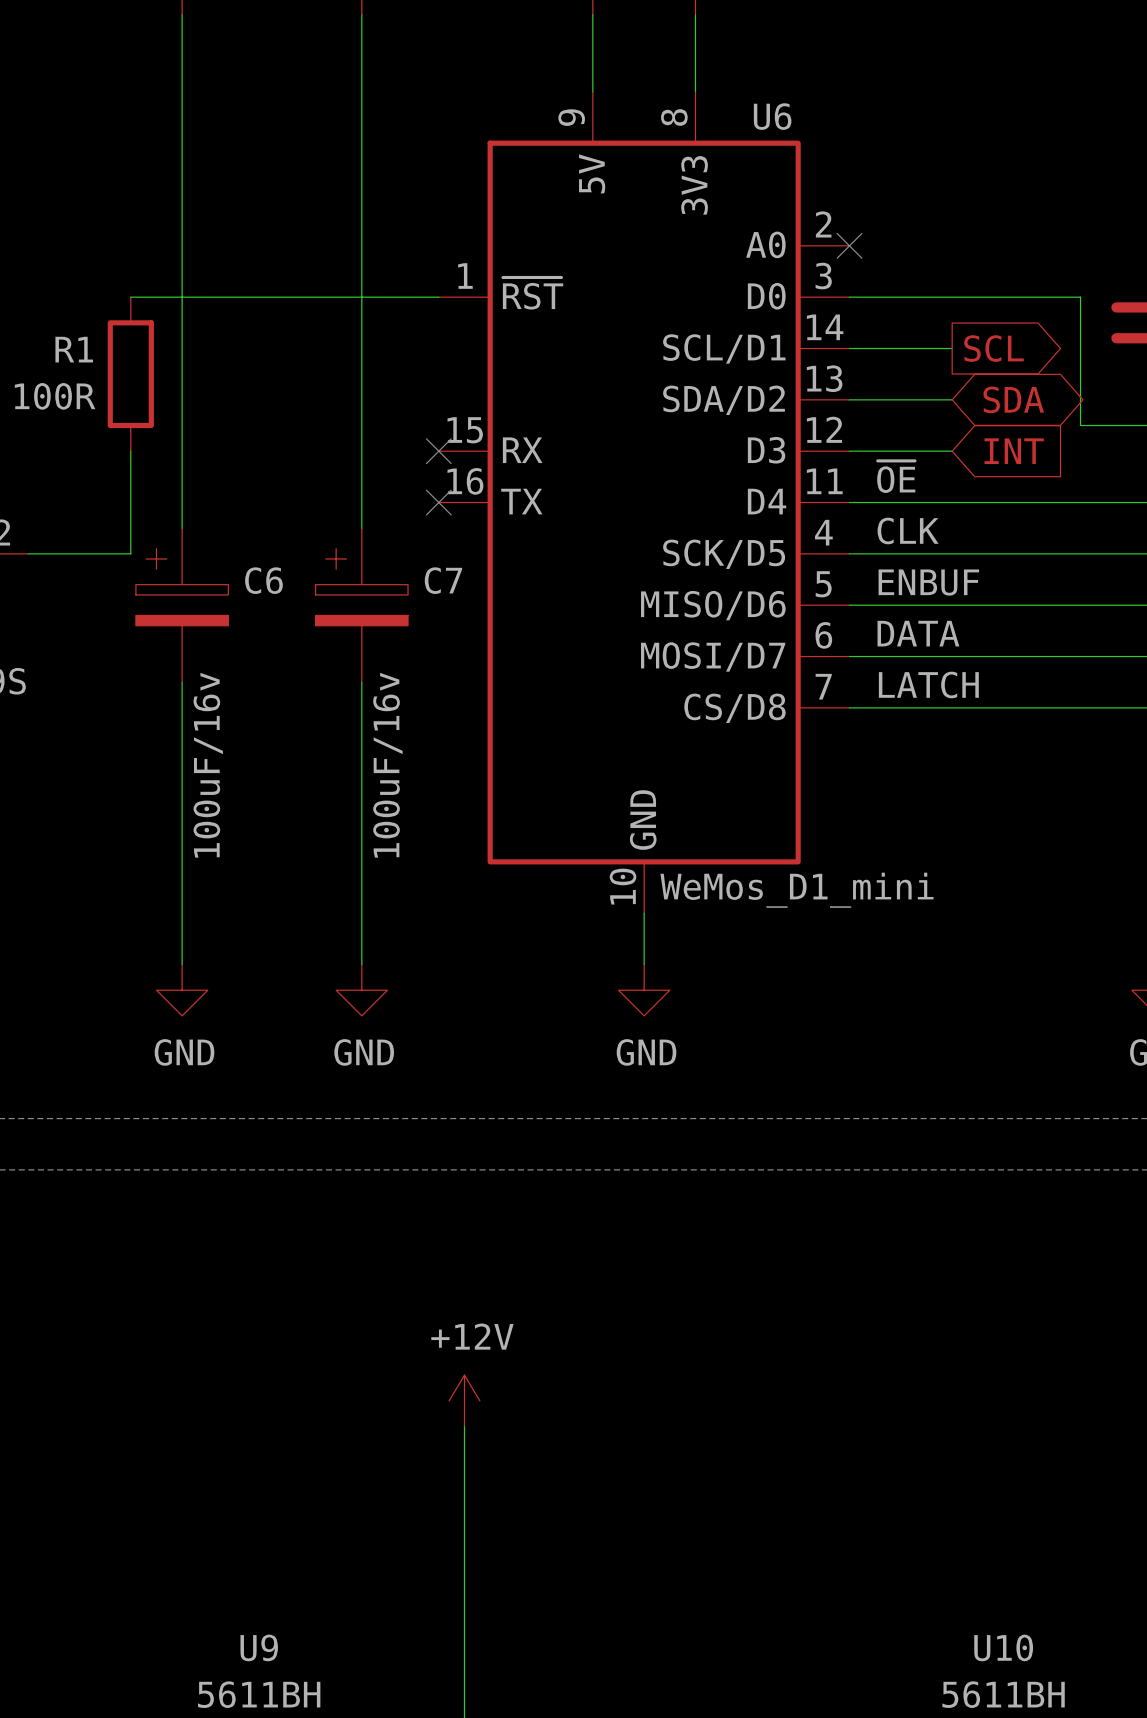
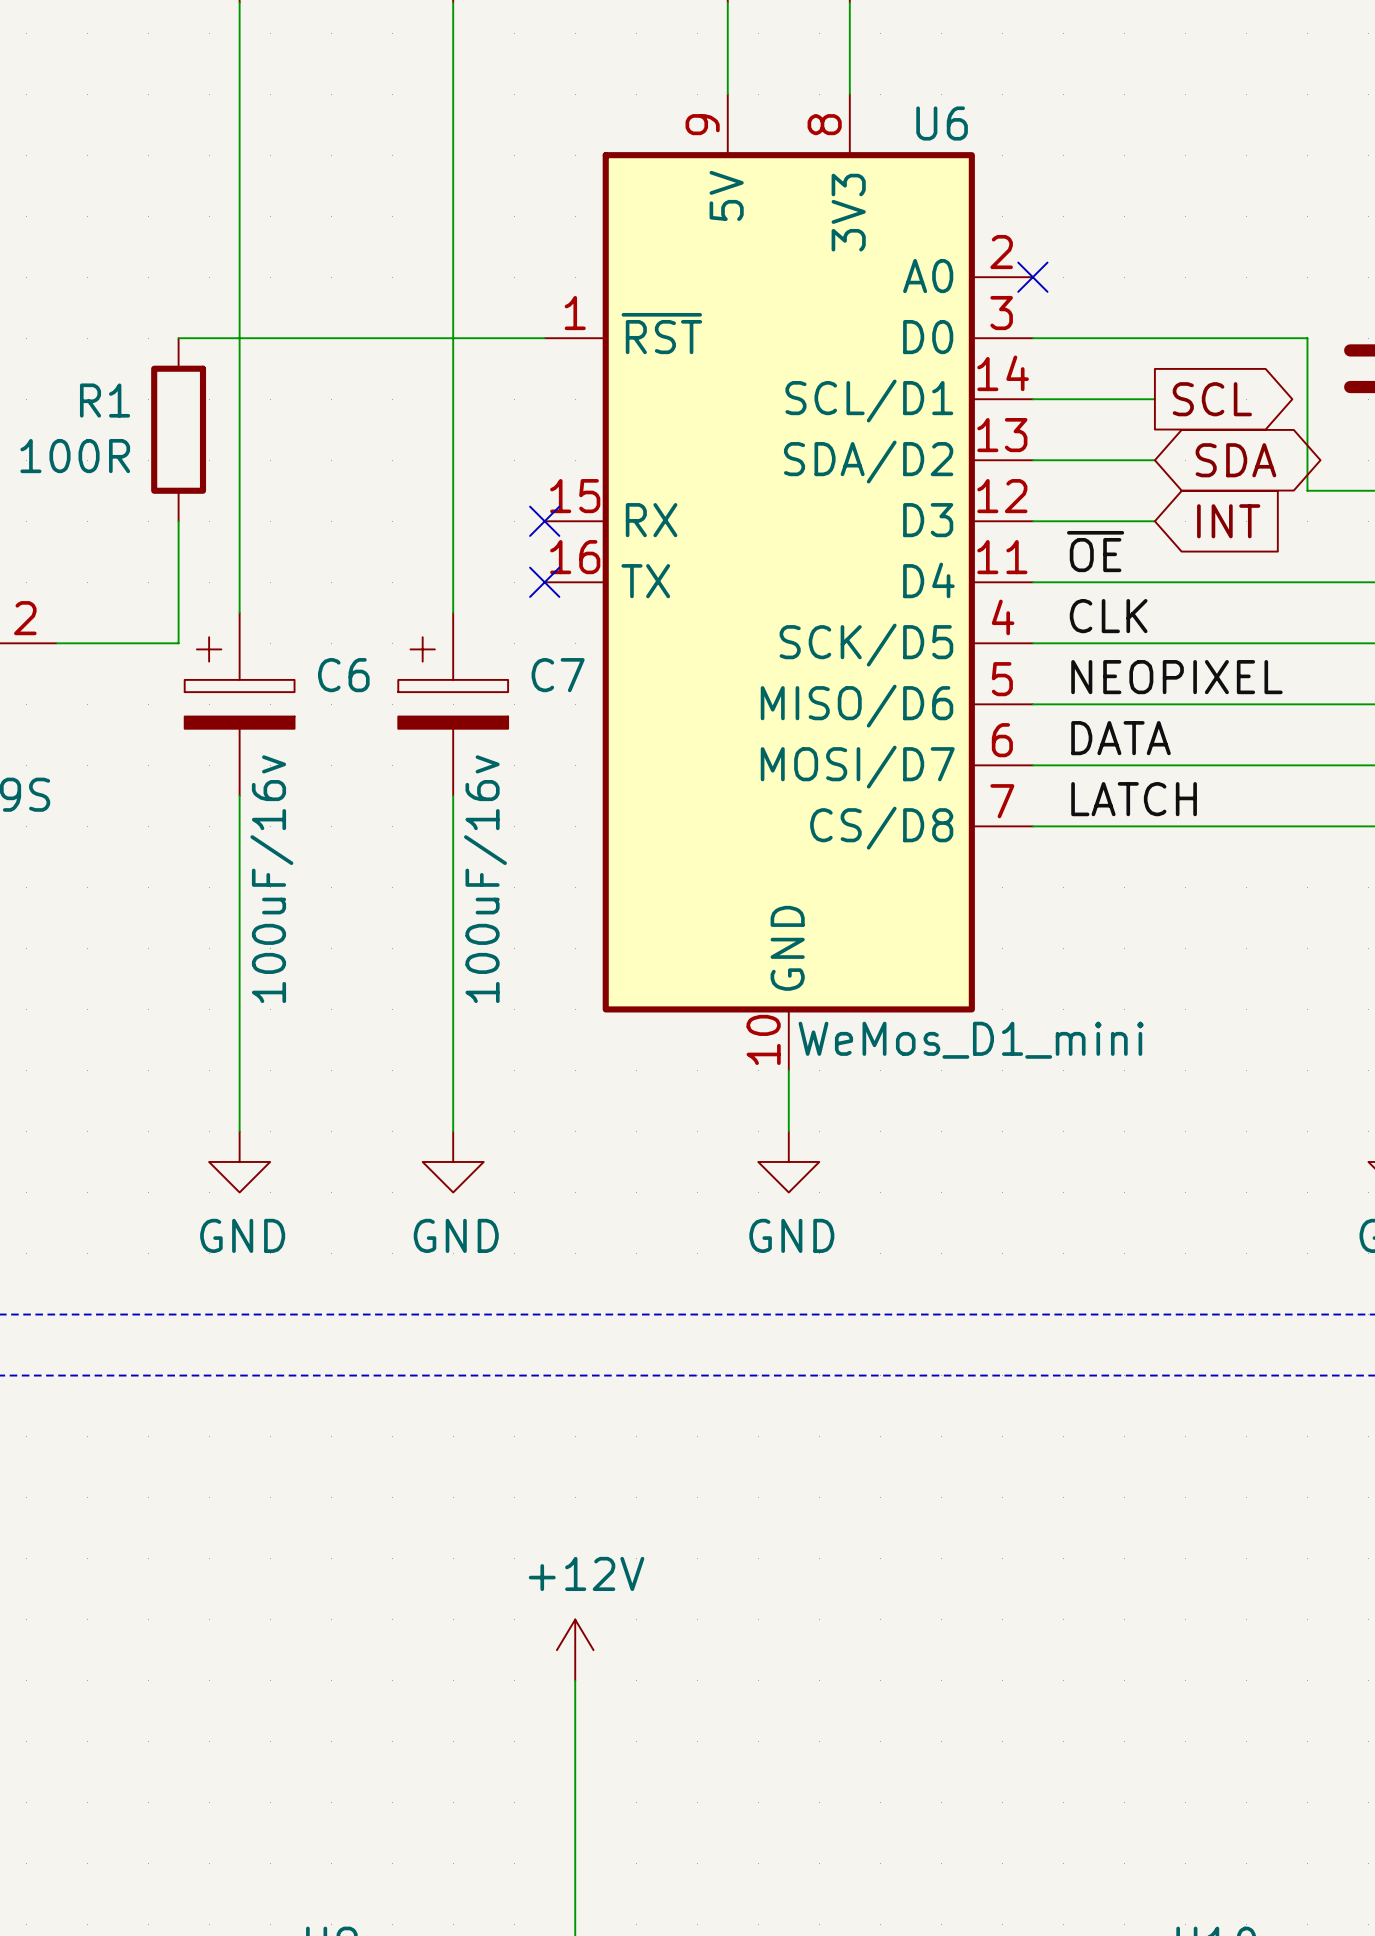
label: ENBUF (928, 582) -> NEOPIXEL (1176, 677)

